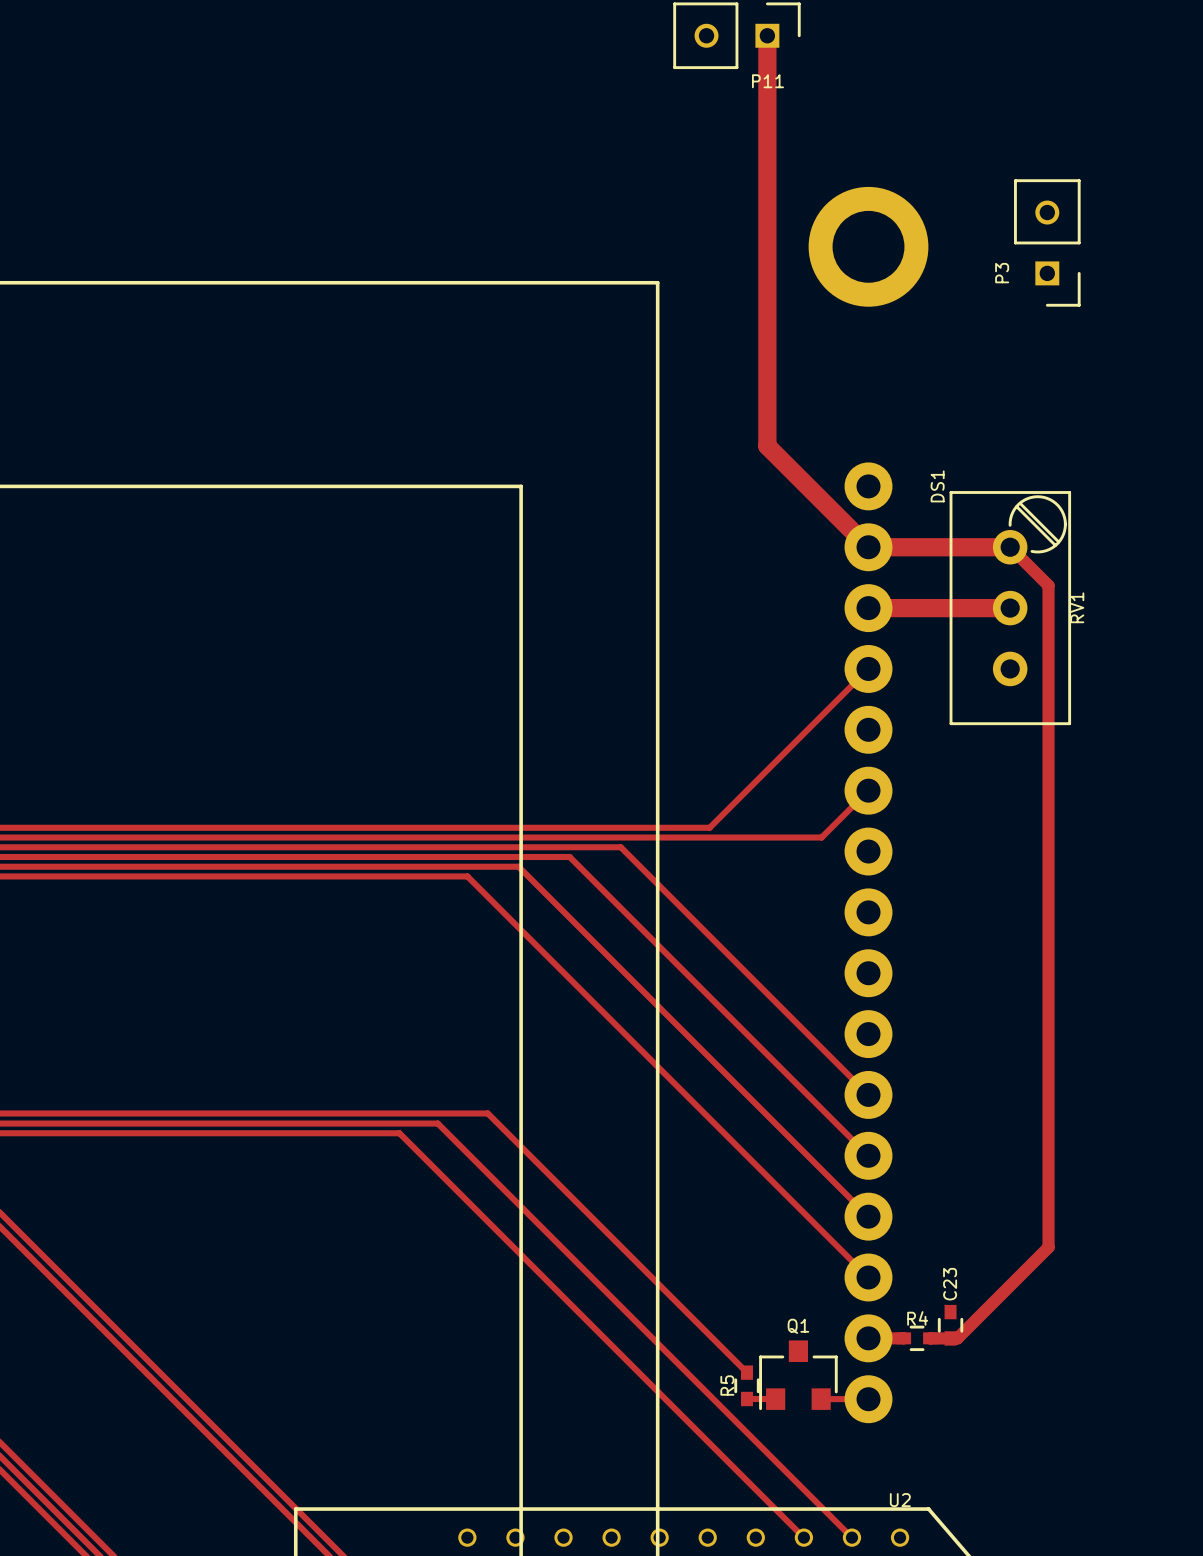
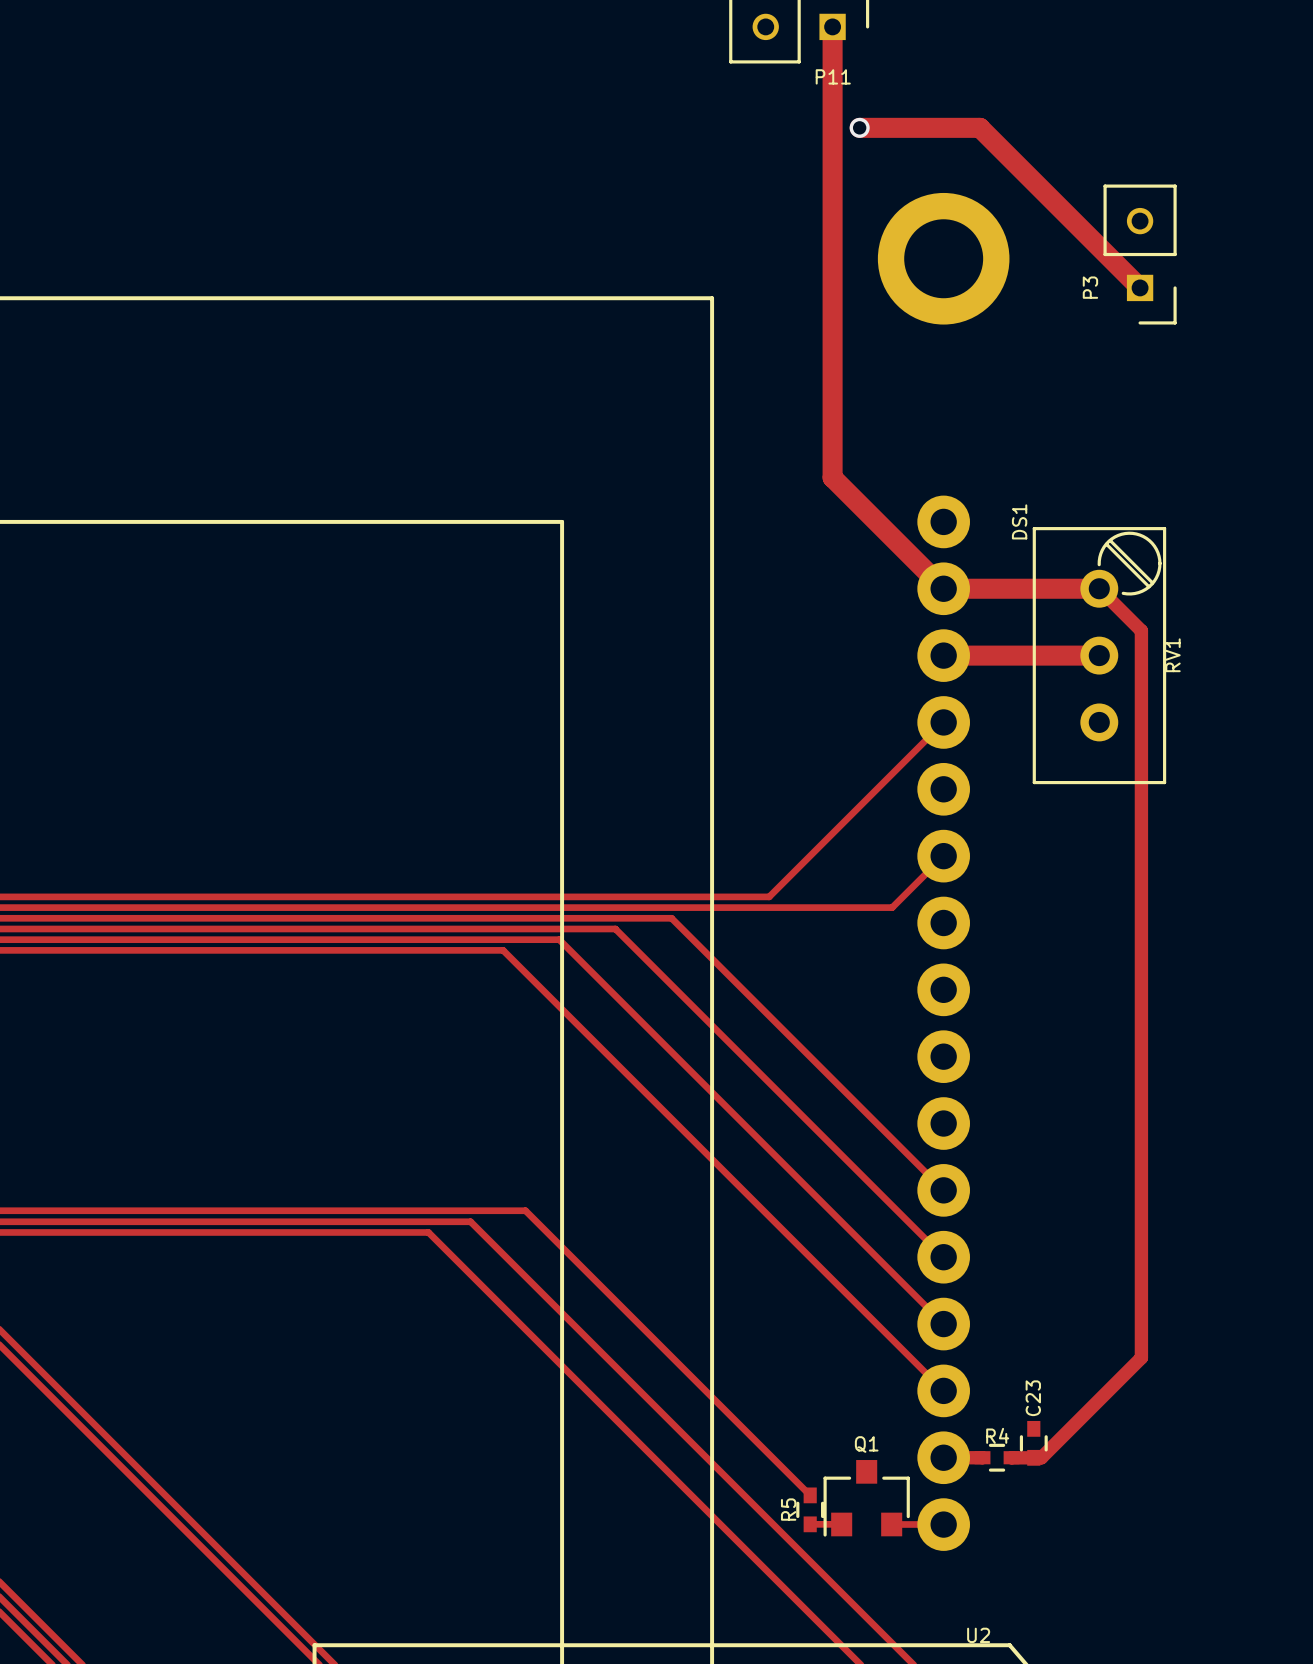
track: none -> (859, 127) (979, 127) (1140, 287)
via: none -> (859, 127)

